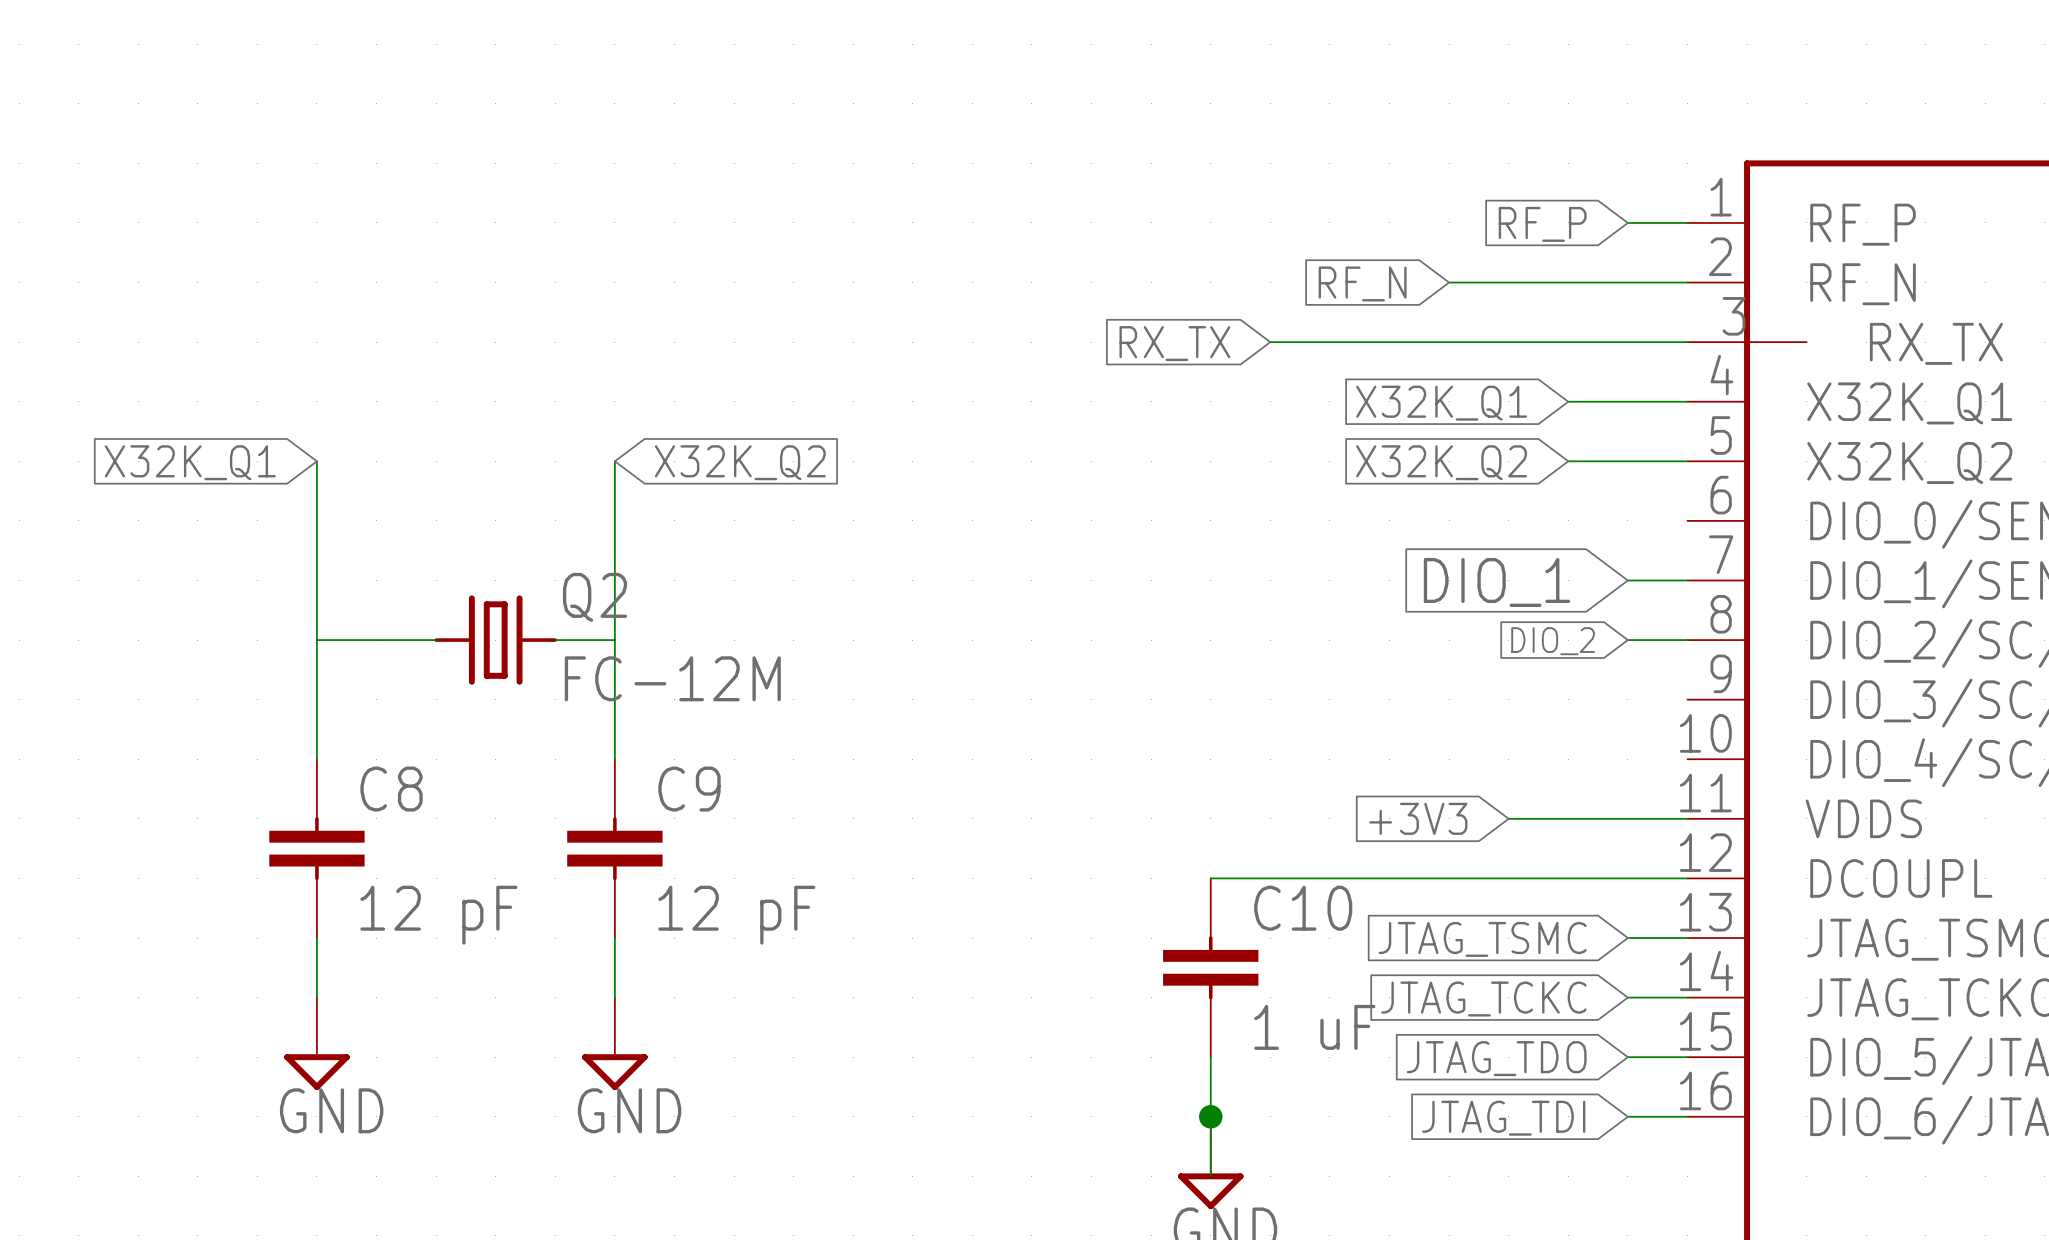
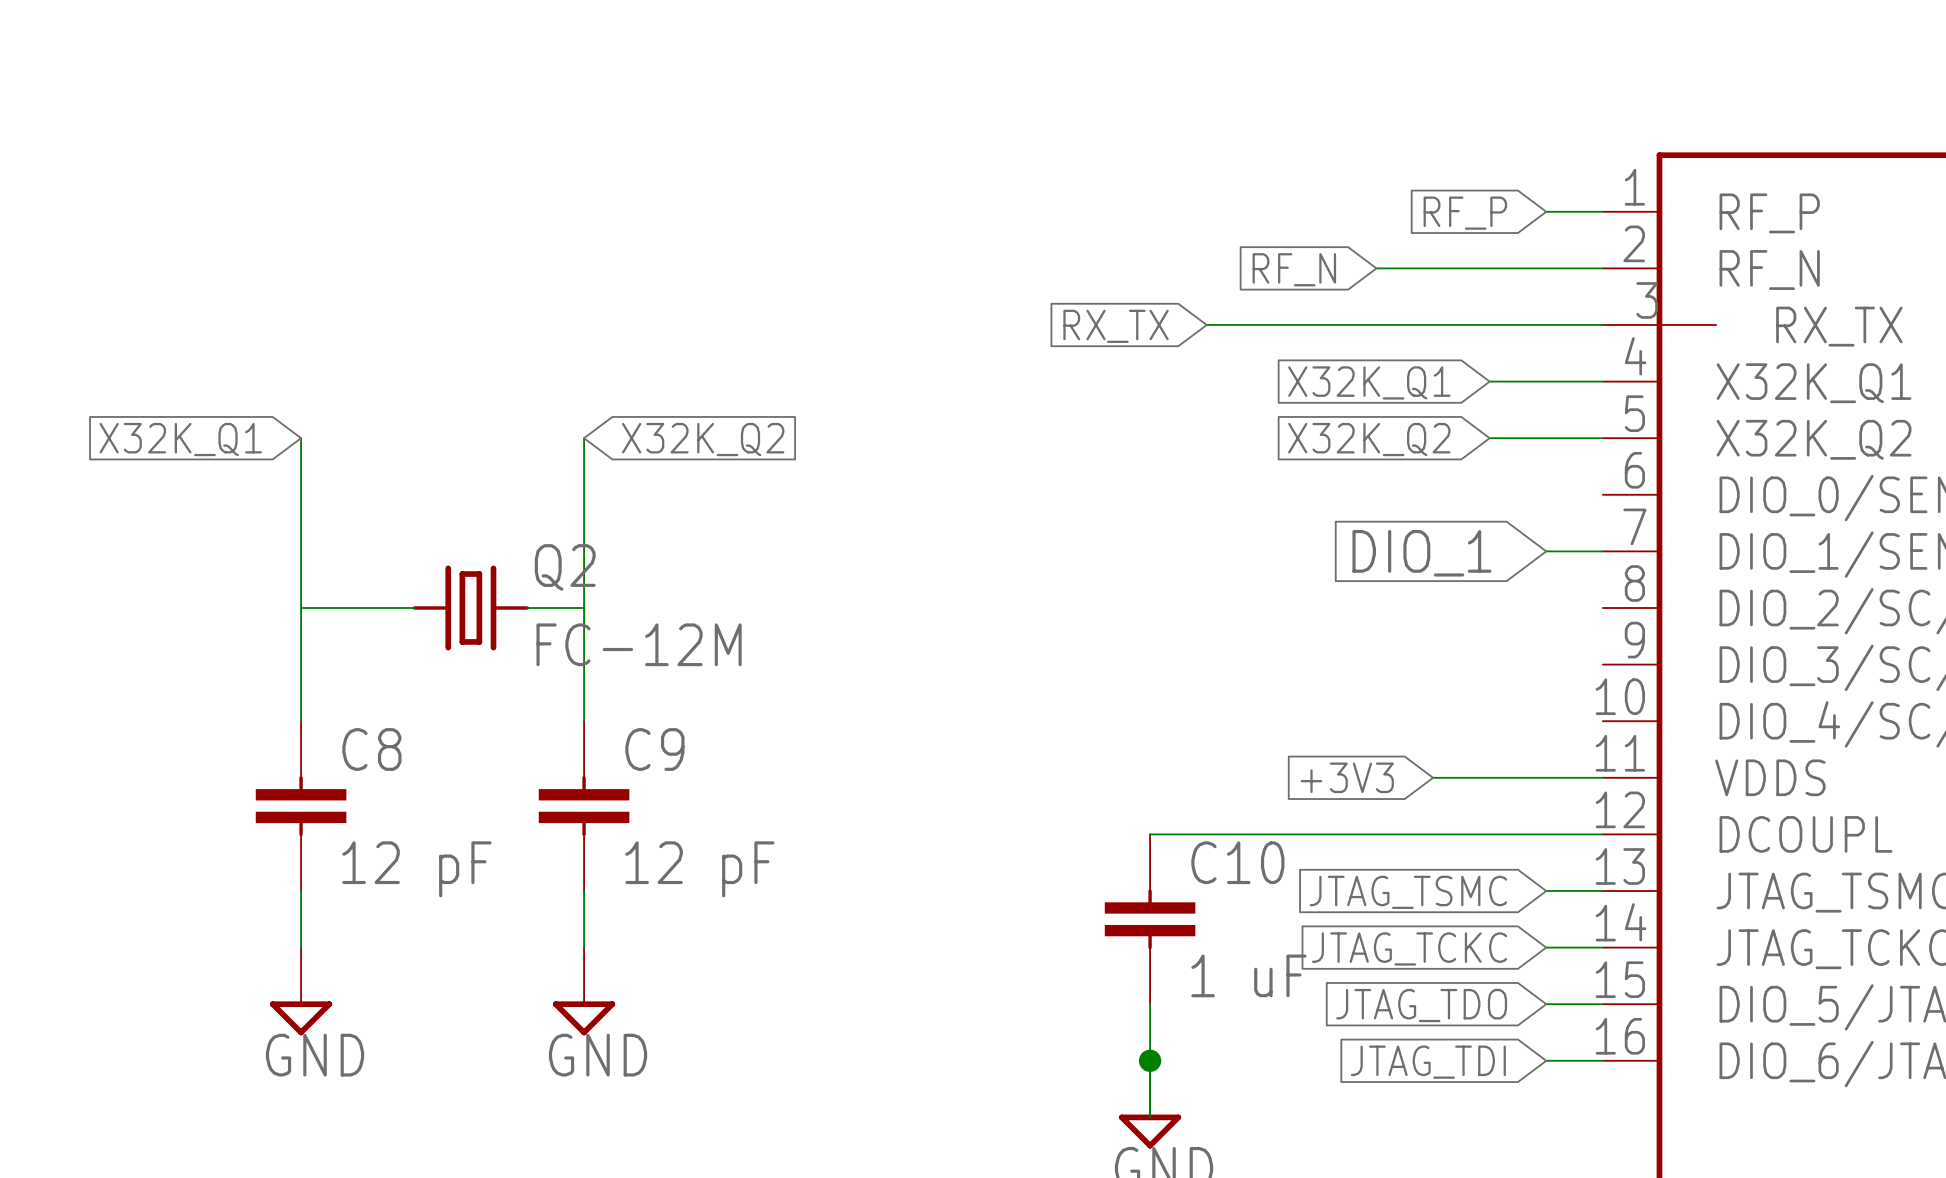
wire: (1627, 640) (1687, 640) -> none
global label: DIO_2 (1553, 641) -> none

